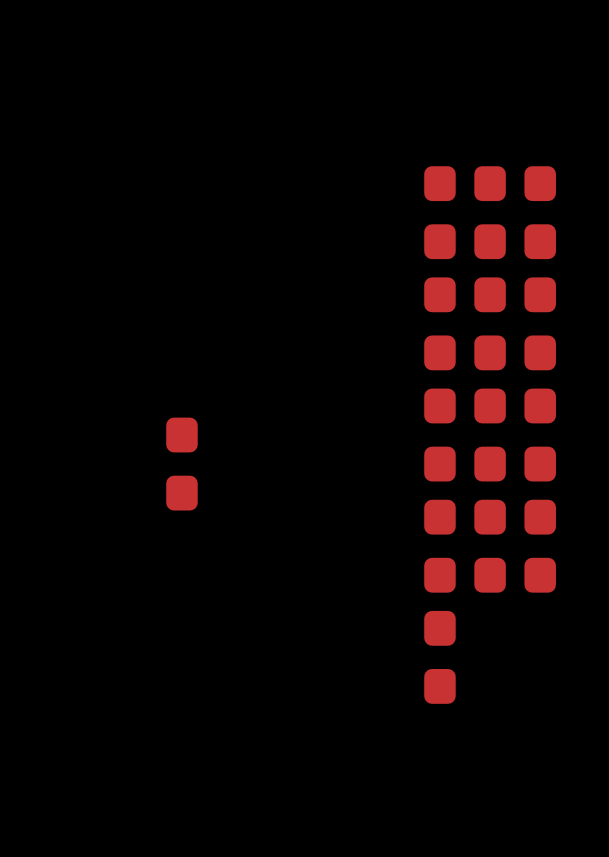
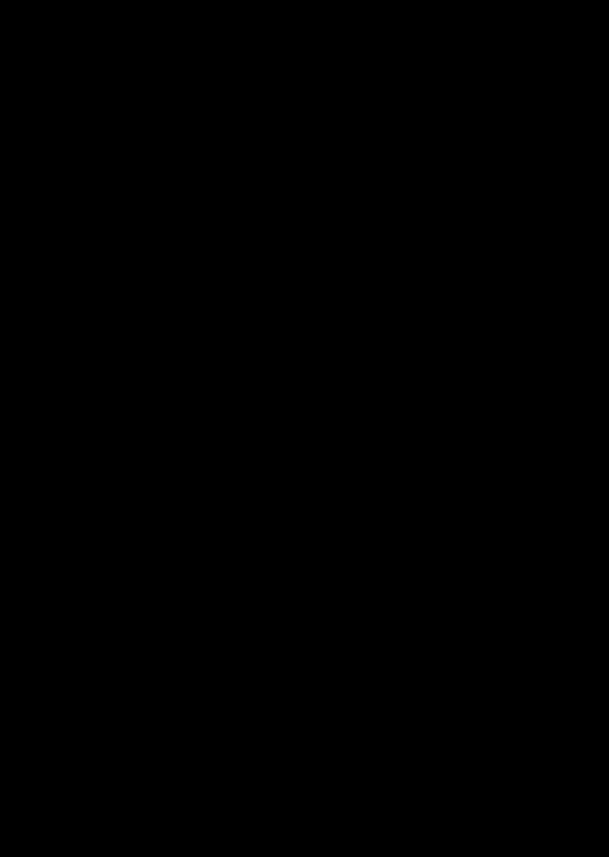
part: (439, 212) -> none
part: (490, 212) -> none
part: (540, 212) -> none
part: (439, 323) -> none
part: (490, 323) -> none
part: (540, 323) -> none
part: (439, 435) -> none
part: (490, 435) -> none
part: (540, 435) -> none
part: (181, 464) -> none
part: (439, 546) -> none
part: (490, 546) -> none
part: (540, 546) -> none
part: (439, 657) -> none

